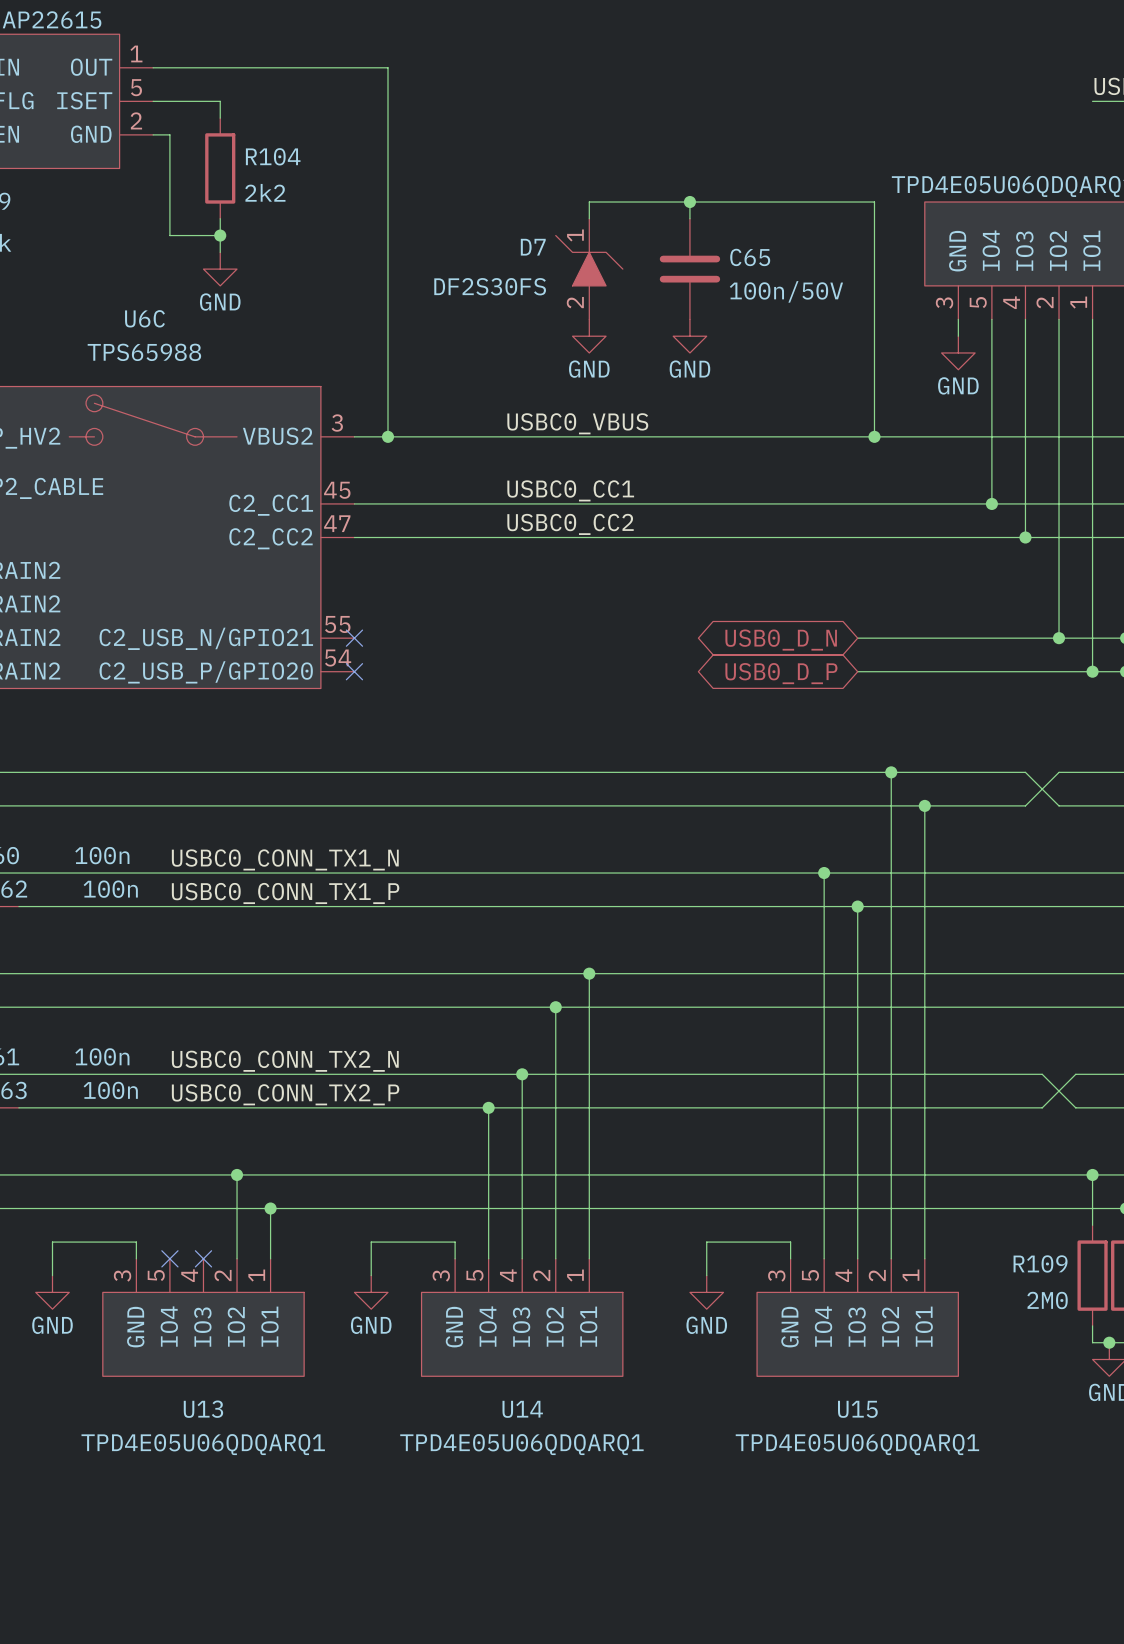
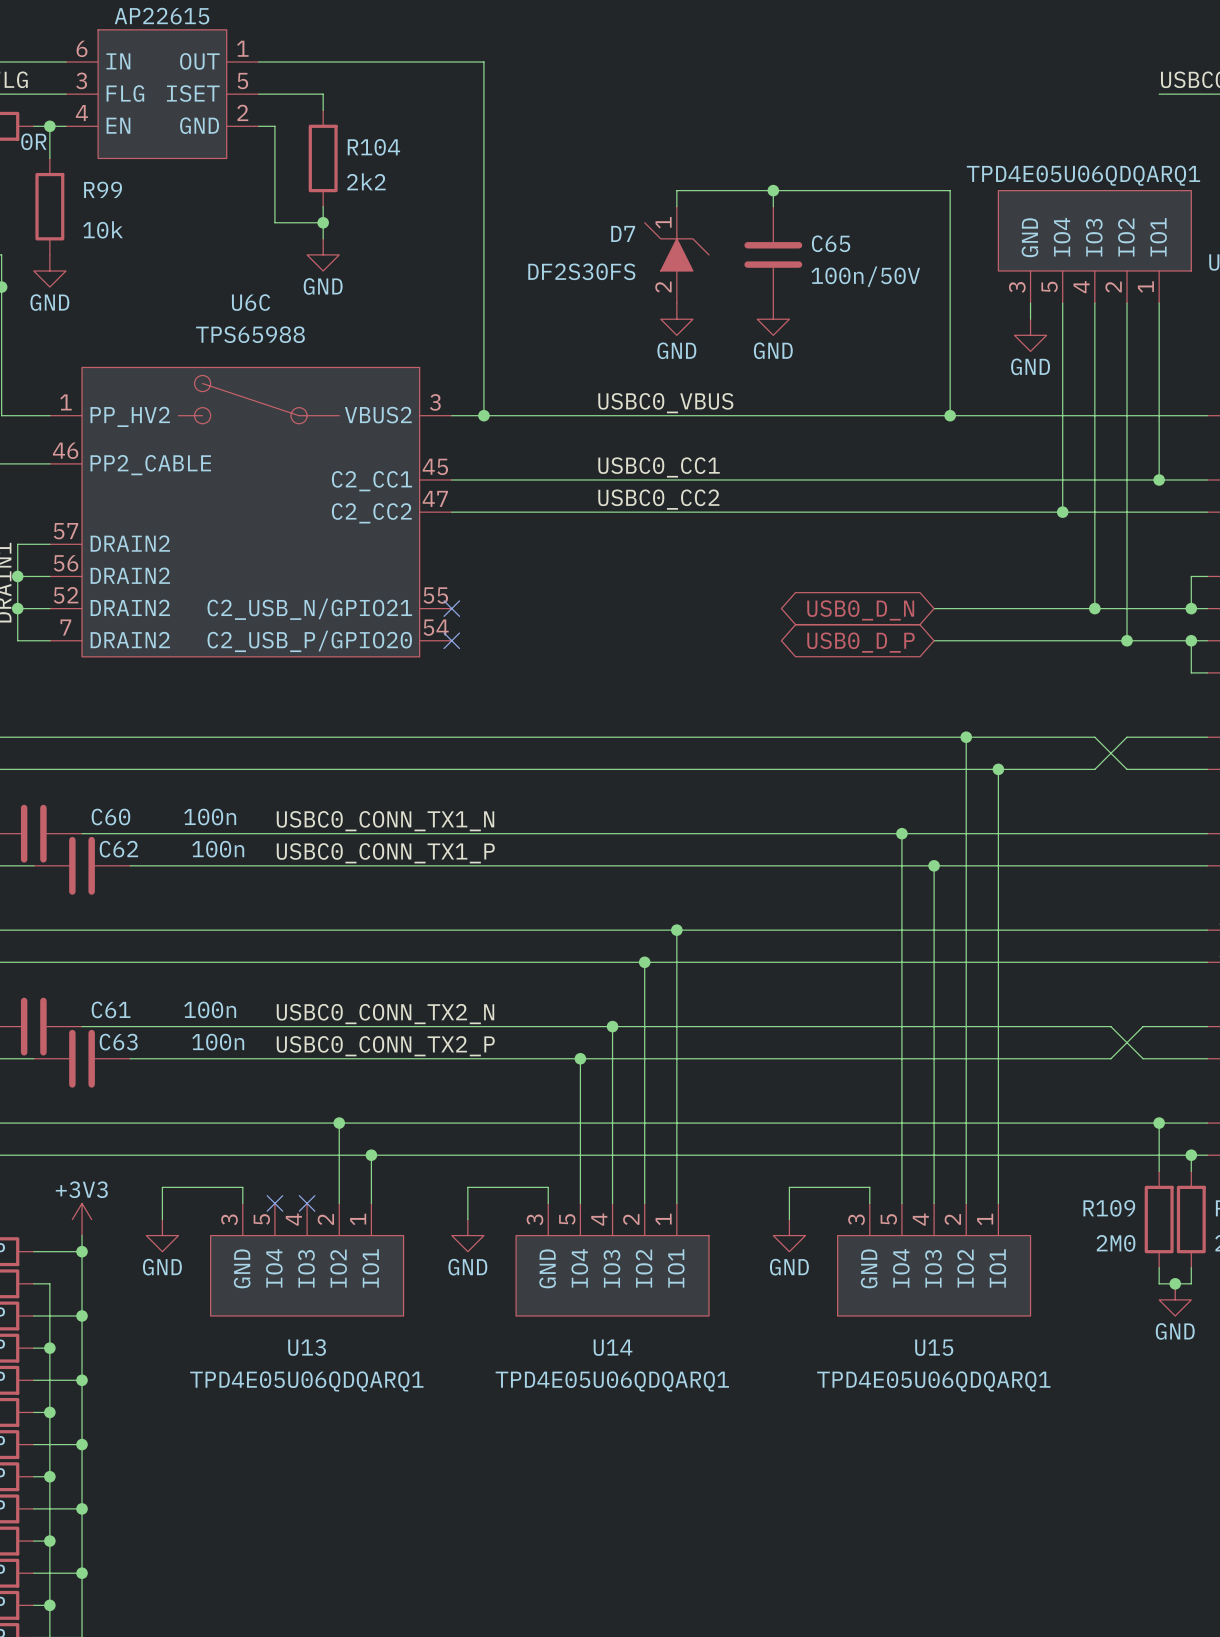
wire: none -> (1062, 479) (1062, 512)
junction: (991, 503) -> none
wire: (1092, 503) (1092, 671) -> none
junction: none -> (1159, 479)
junction: none -> (1062, 512)
wire: none -> (1094, 512) (1094, 608)
junction: (1025, 537) -> none
junction: none -> (1094, 608)
wire: none -> (1127, 608) (1127, 640)
junction: (1059, 638) -> none
junction: none -> (1127, 640)
junction: (1092, 671) -> none

